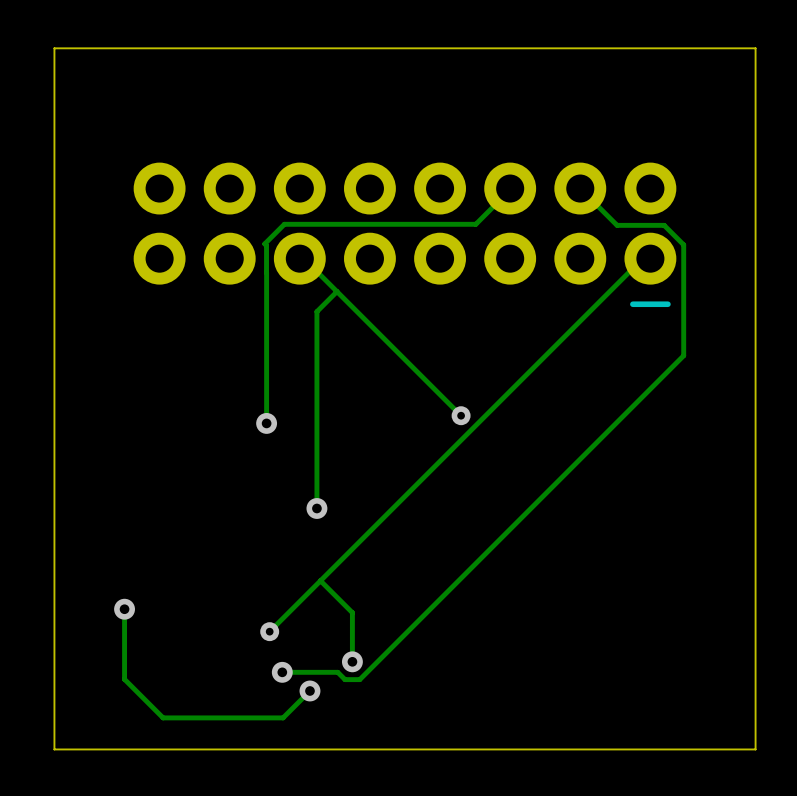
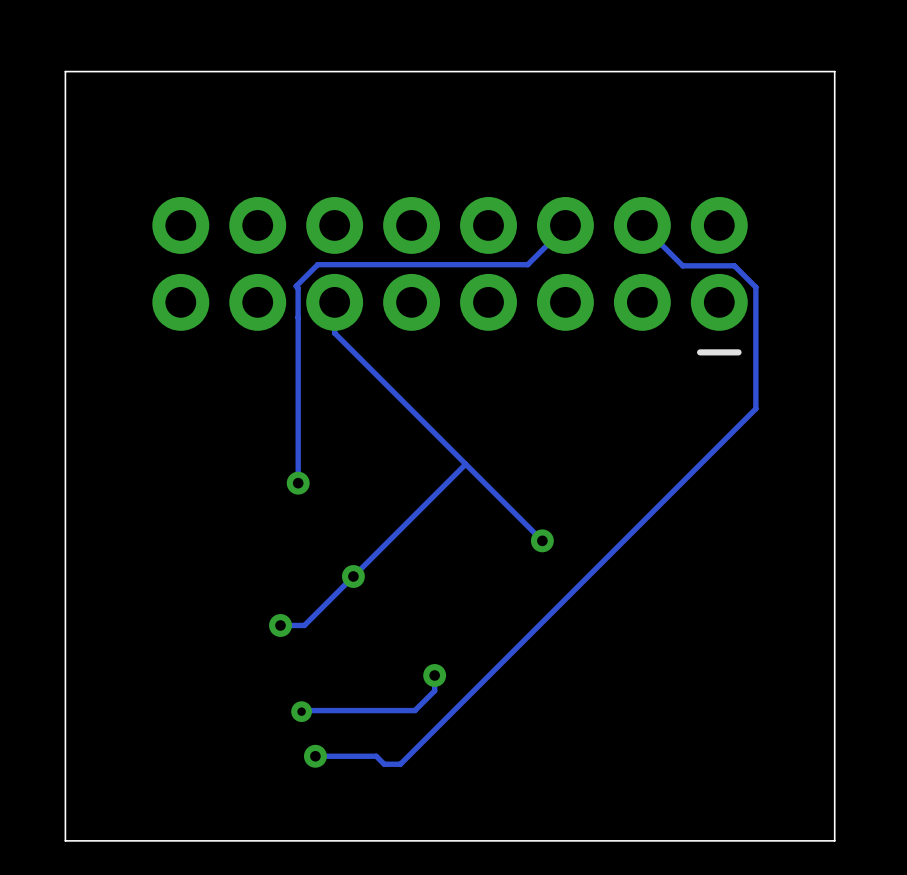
track: (299, 258) (304, 258) (461, 415) -> (334, 302) (334, 333) (542, 540)
track: (650, 258) (642, 258) (269, 631) -> none
track: (336, 291) (316, 311) (316, 508) -> none
track: none -> (465, 464) (304, 625) (280, 625)
via: (461, 415) -> none
via: none -> (542, 540)
via: none -> (280, 625)
track: (320, 580) (352, 612) (352, 661) -> none
track: none -> (434, 675) (434, 690) (414, 710) (304, 710)
via: none -> (434, 675)
track: (124, 609) (124, 679) (163, 717) (283, 717) (309, 690) -> none
via: (124, 609) -> none
via: (352, 661) -> none
via: (309, 690) -> none

